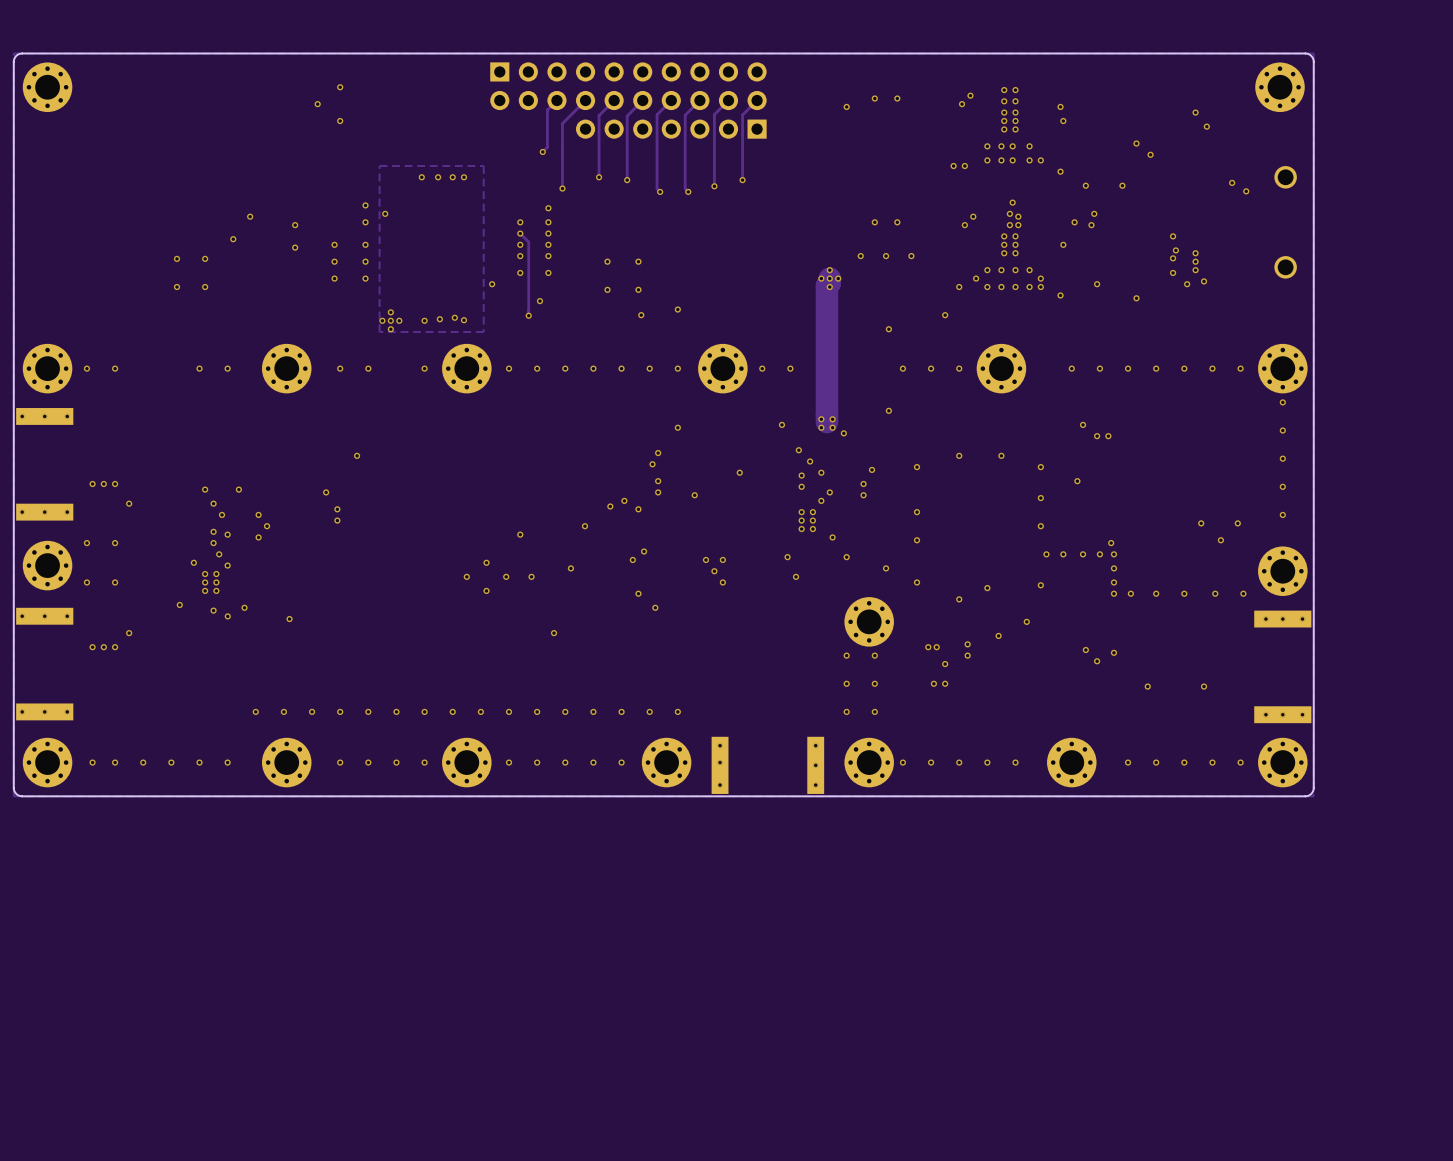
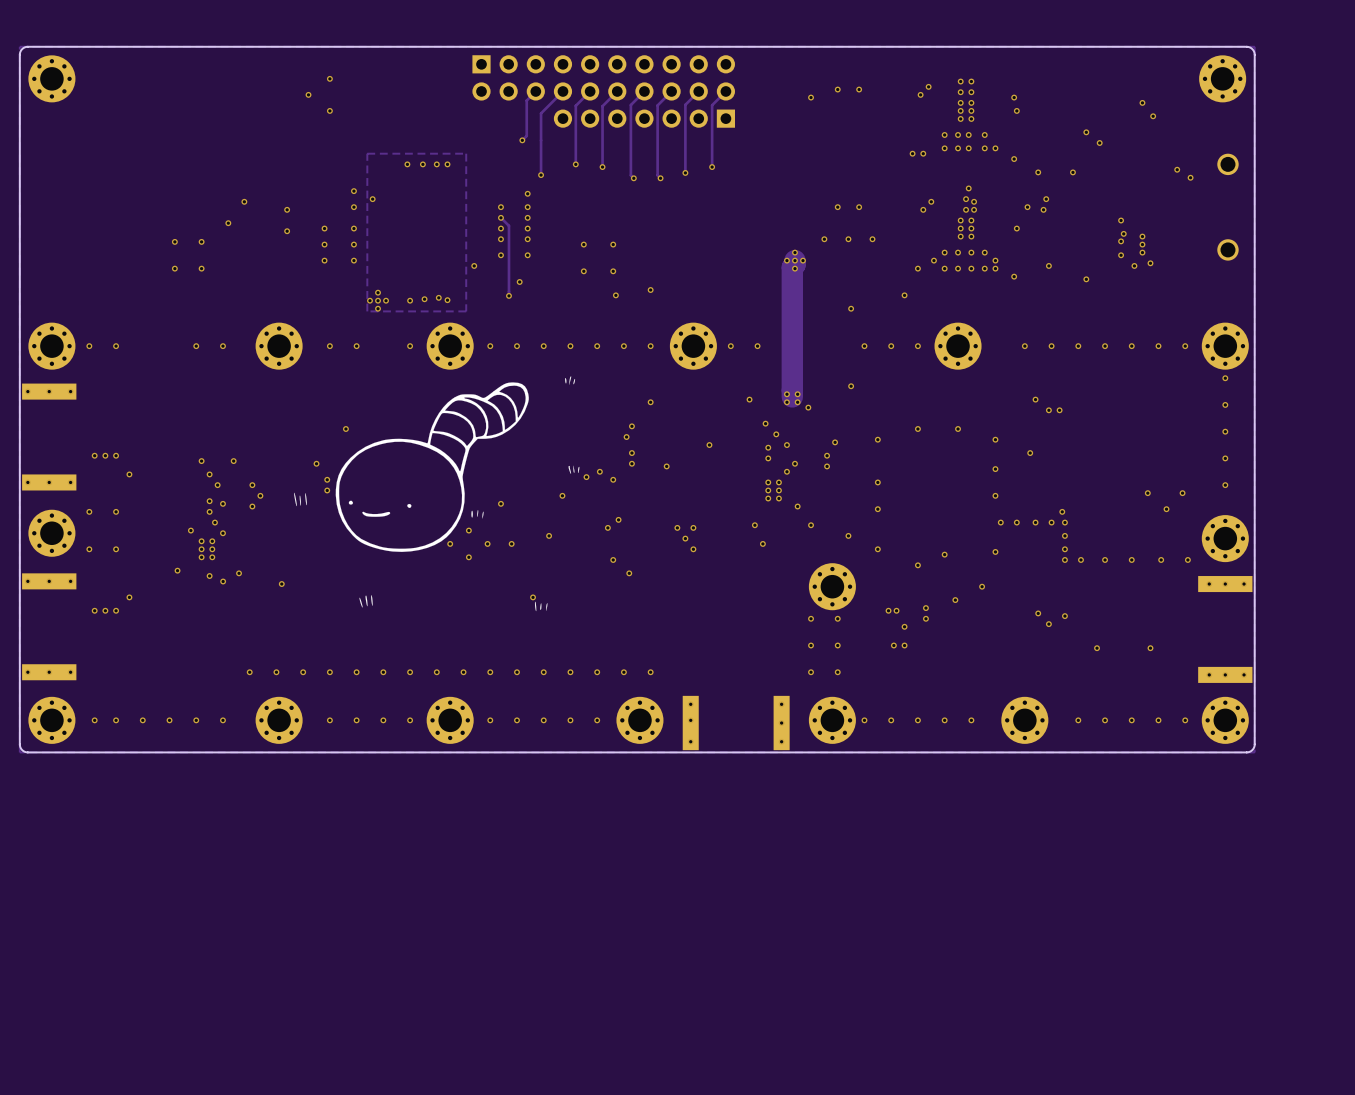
drawing: none -> [294, 376, 580, 612]

